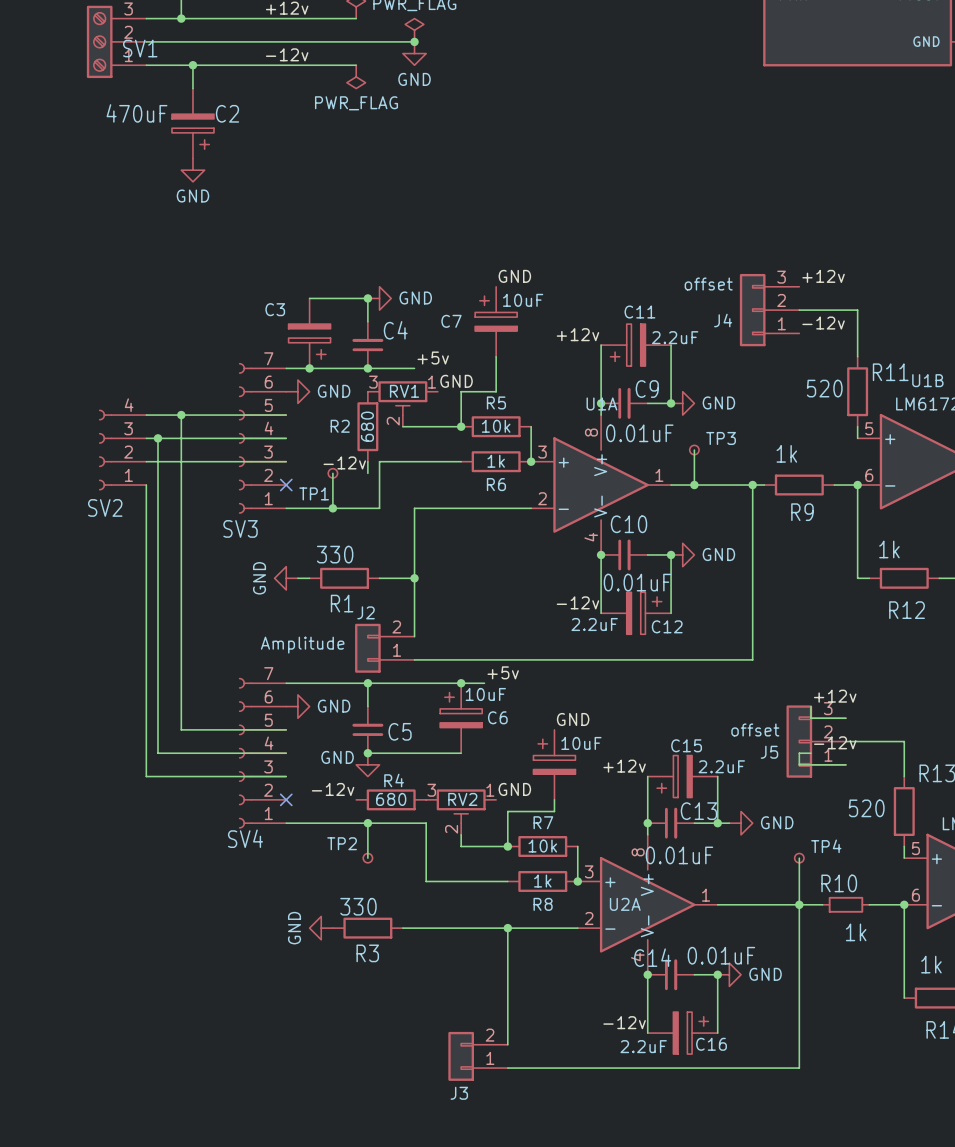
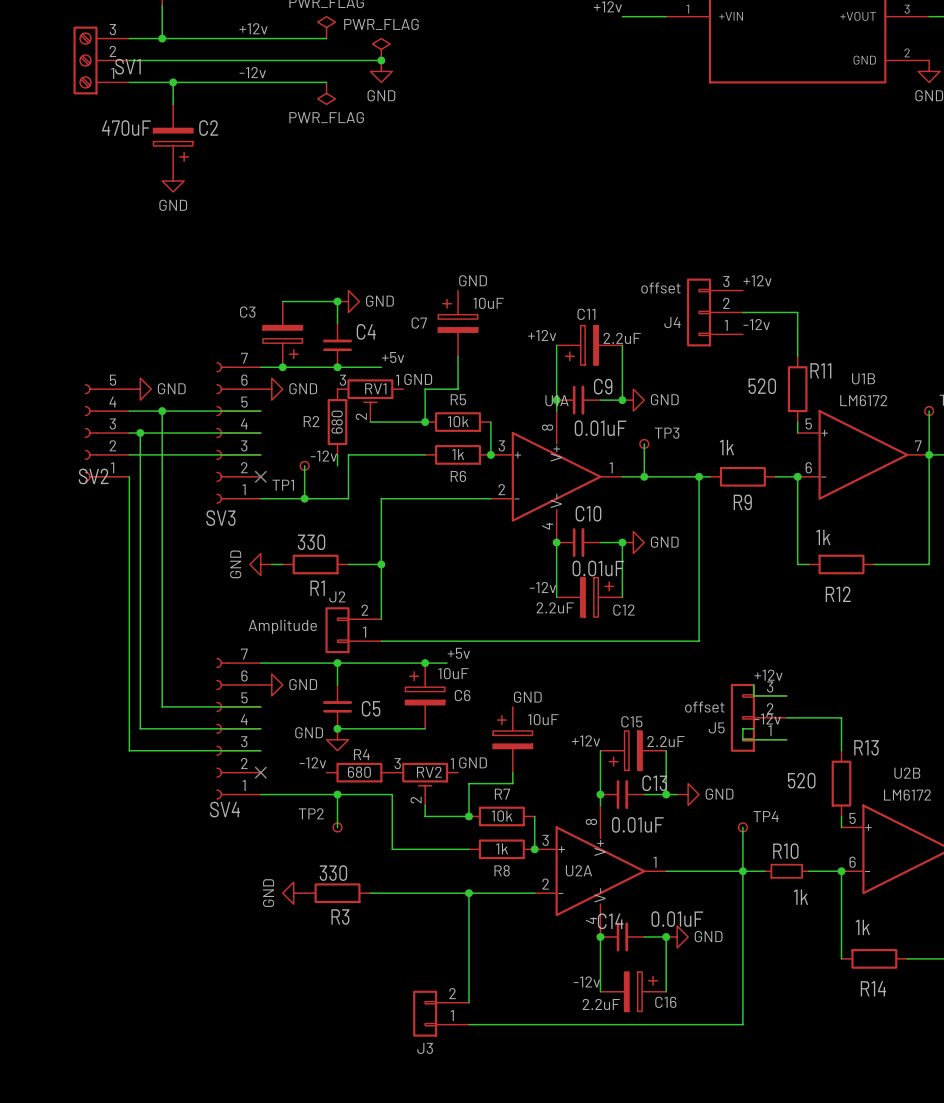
power symbol: none -> GND (140, 389)
SV2 symbol: [98, 409, 147, 491] -> [84, 384, 130, 482]

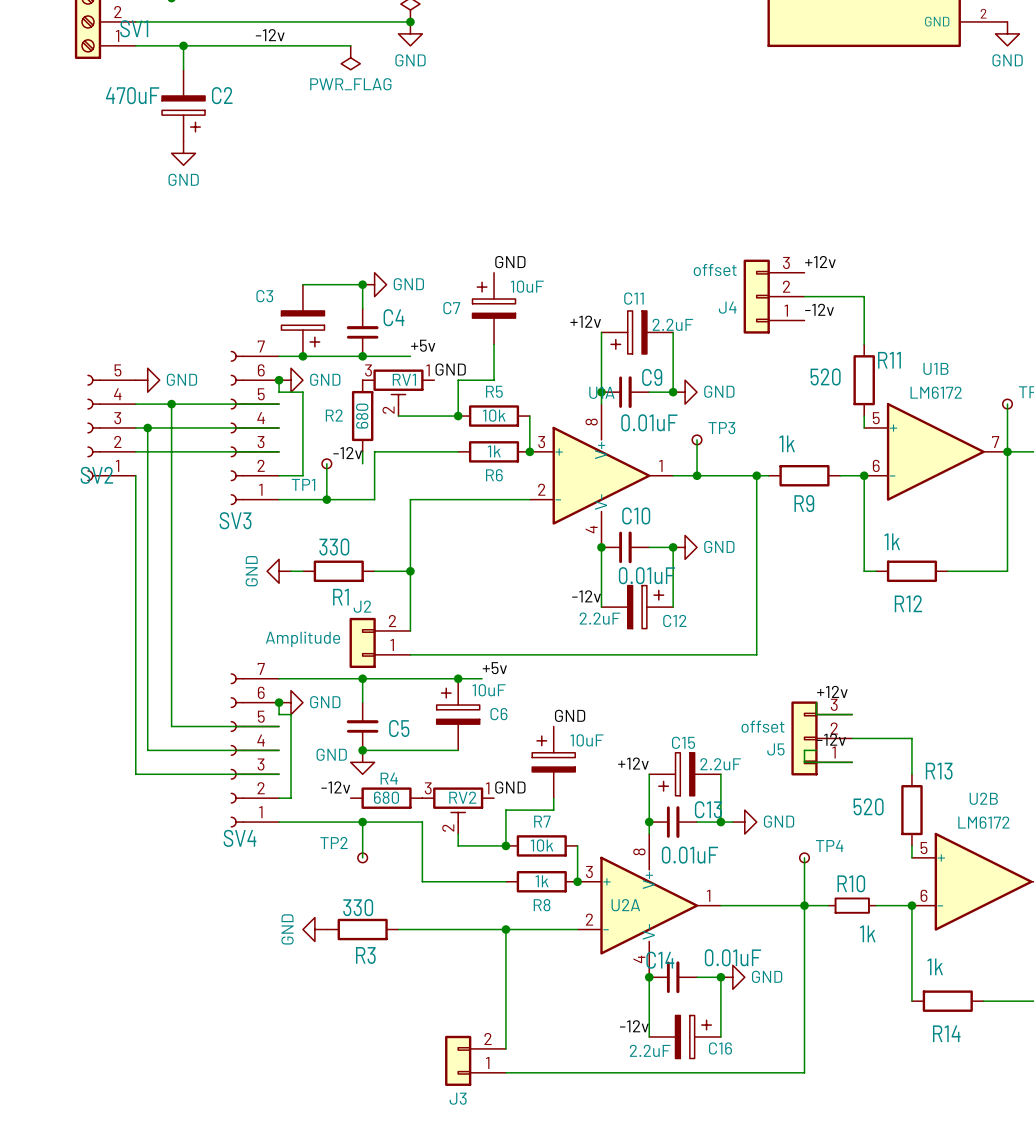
wire: none -> (279, 380) (279, 392) (302, 392) (302, 475) (279, 475)
junction: none -> (279, 380)
no-connect mark: (260, 476) -> none
wire: none -> (279, 702) (279, 714) (291, 714) (291, 798) (279, 798)
junction: none -> (279, 702)
no-connect mark: (260, 772) -> none

